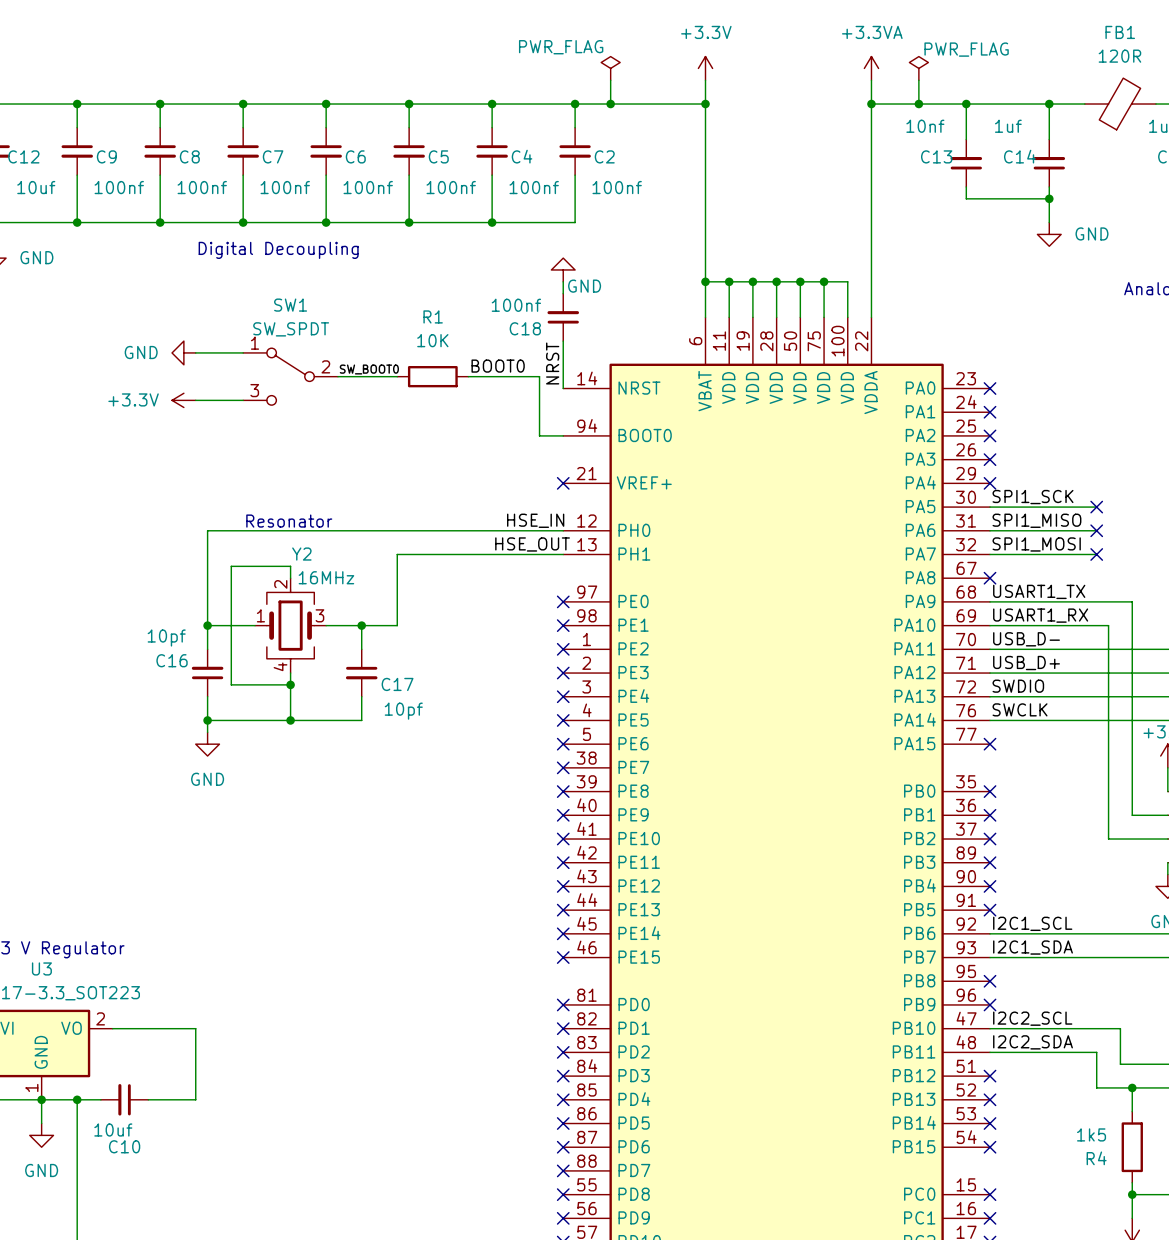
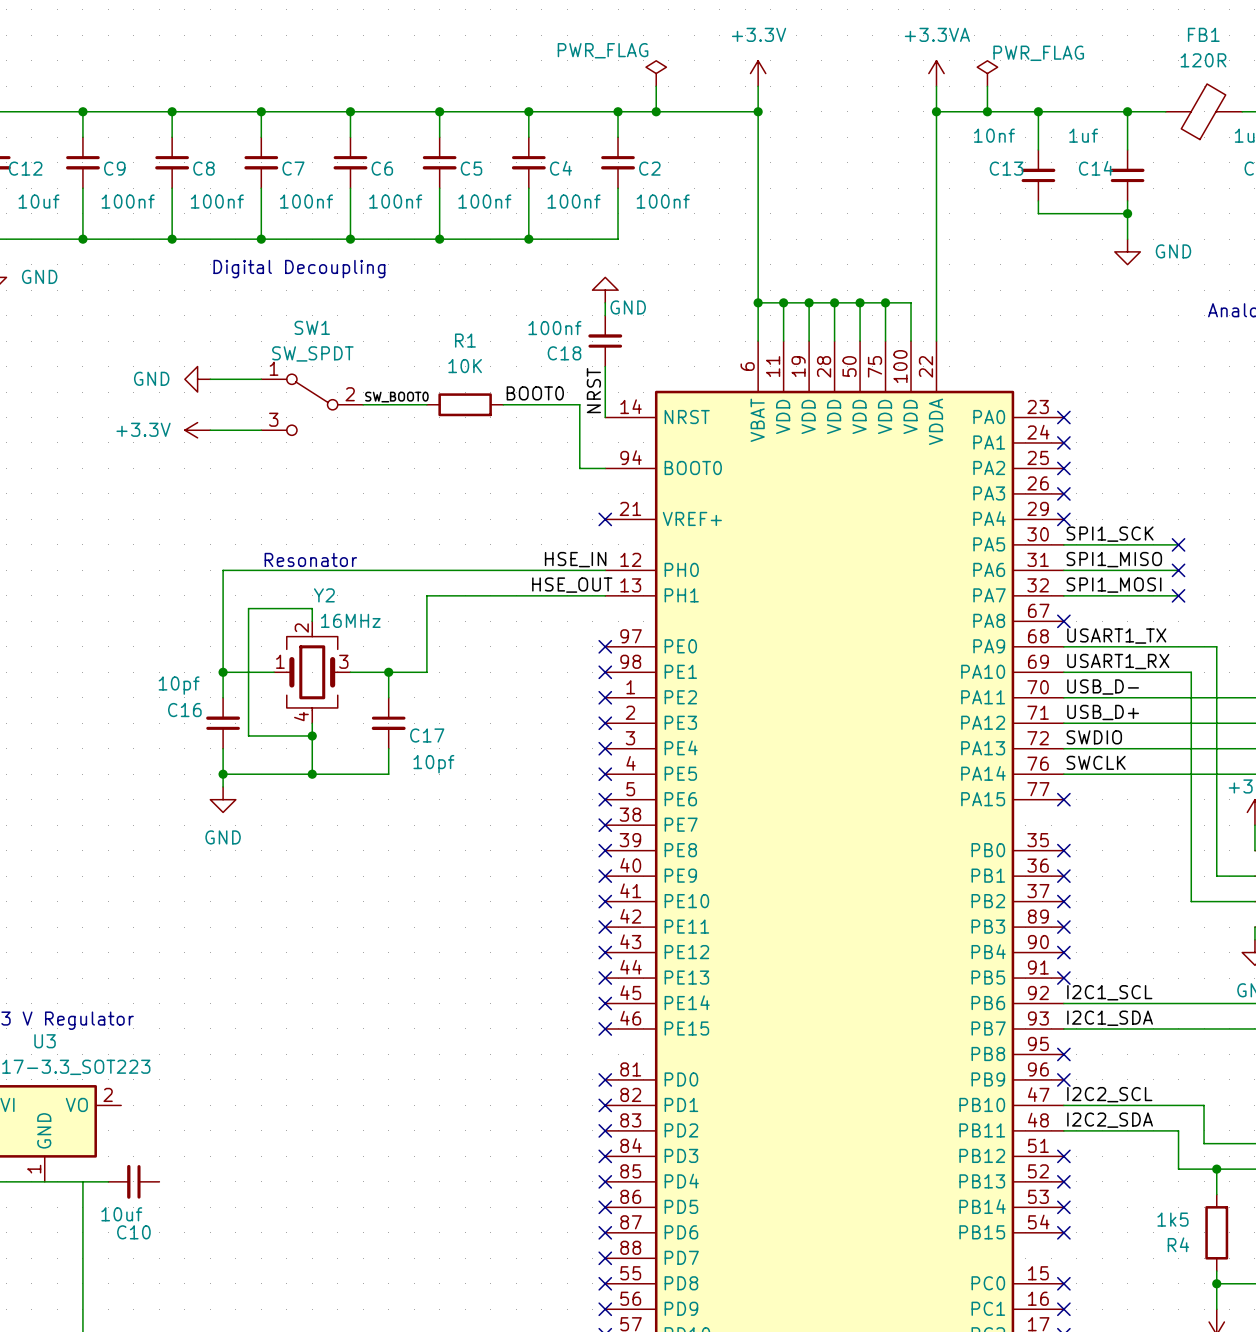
wire: (112, 1028) (195, 1028) (195, 1099) (148, 1099) -> none
wire: (41, 1099) (41, 1123) -> none
junction: (41, 1099) -> none
junction: (77, 1099) -> none
power symbol: GND (41, 1135) -> none

